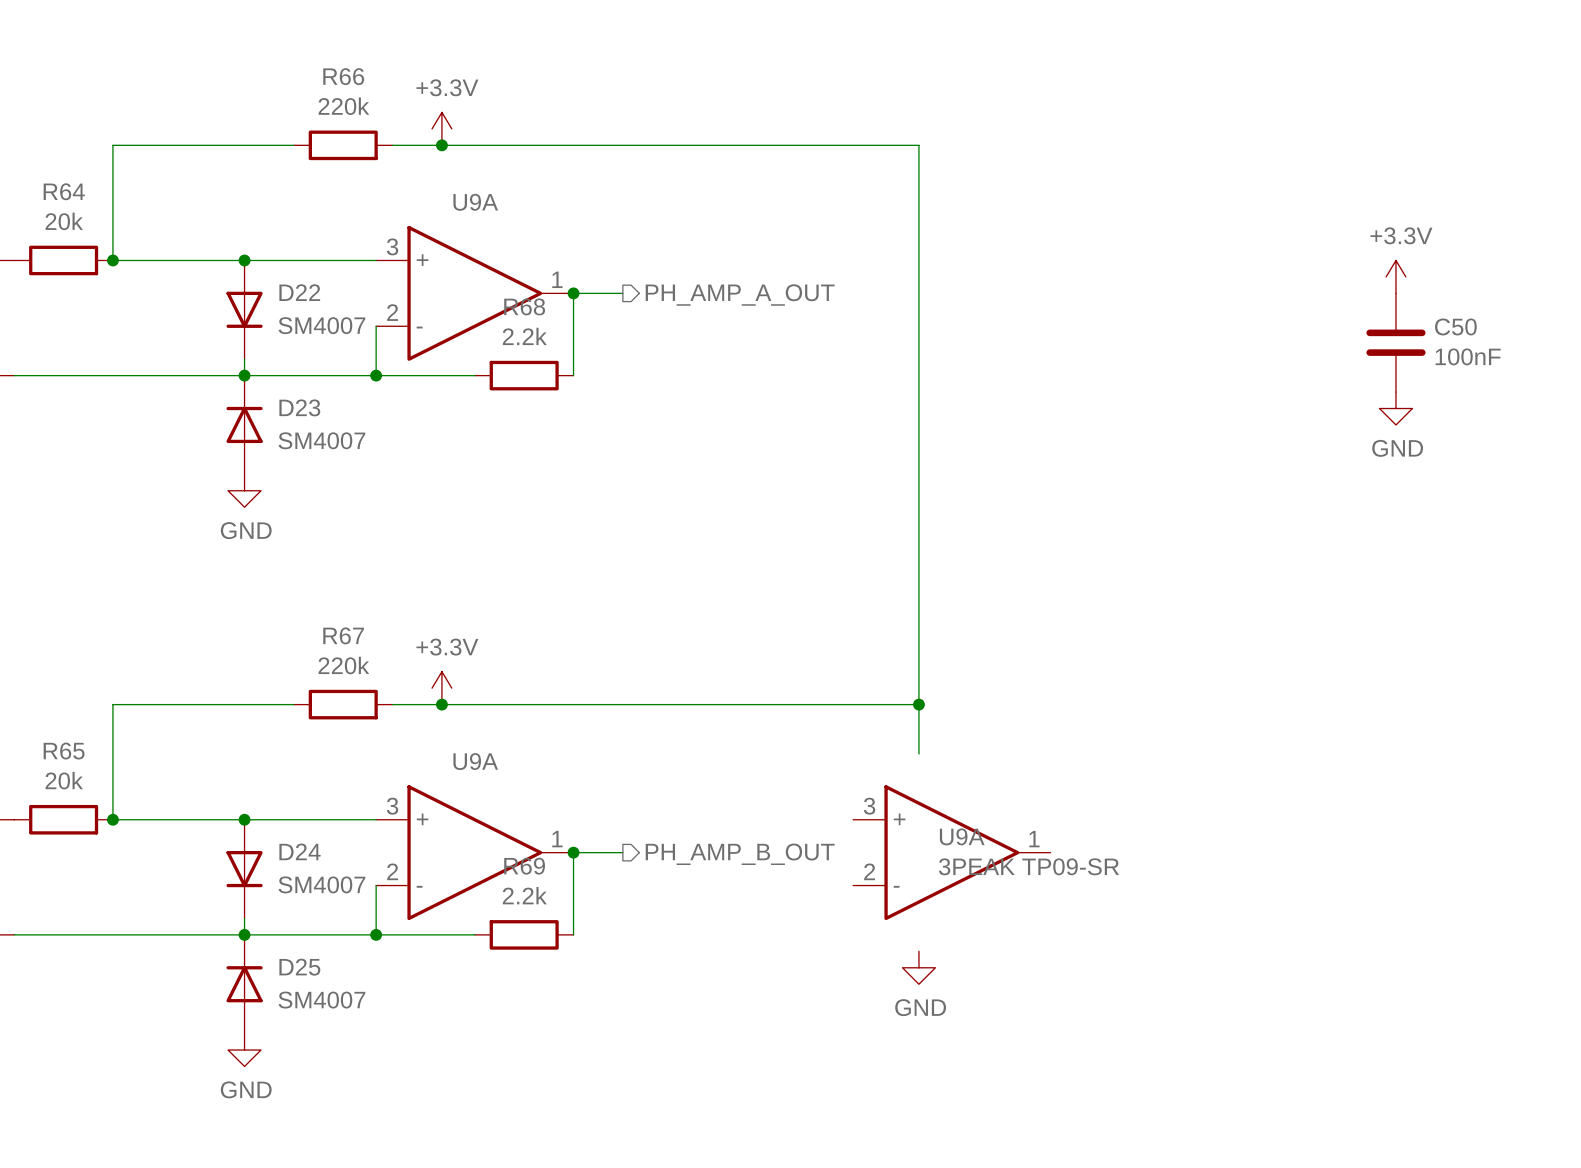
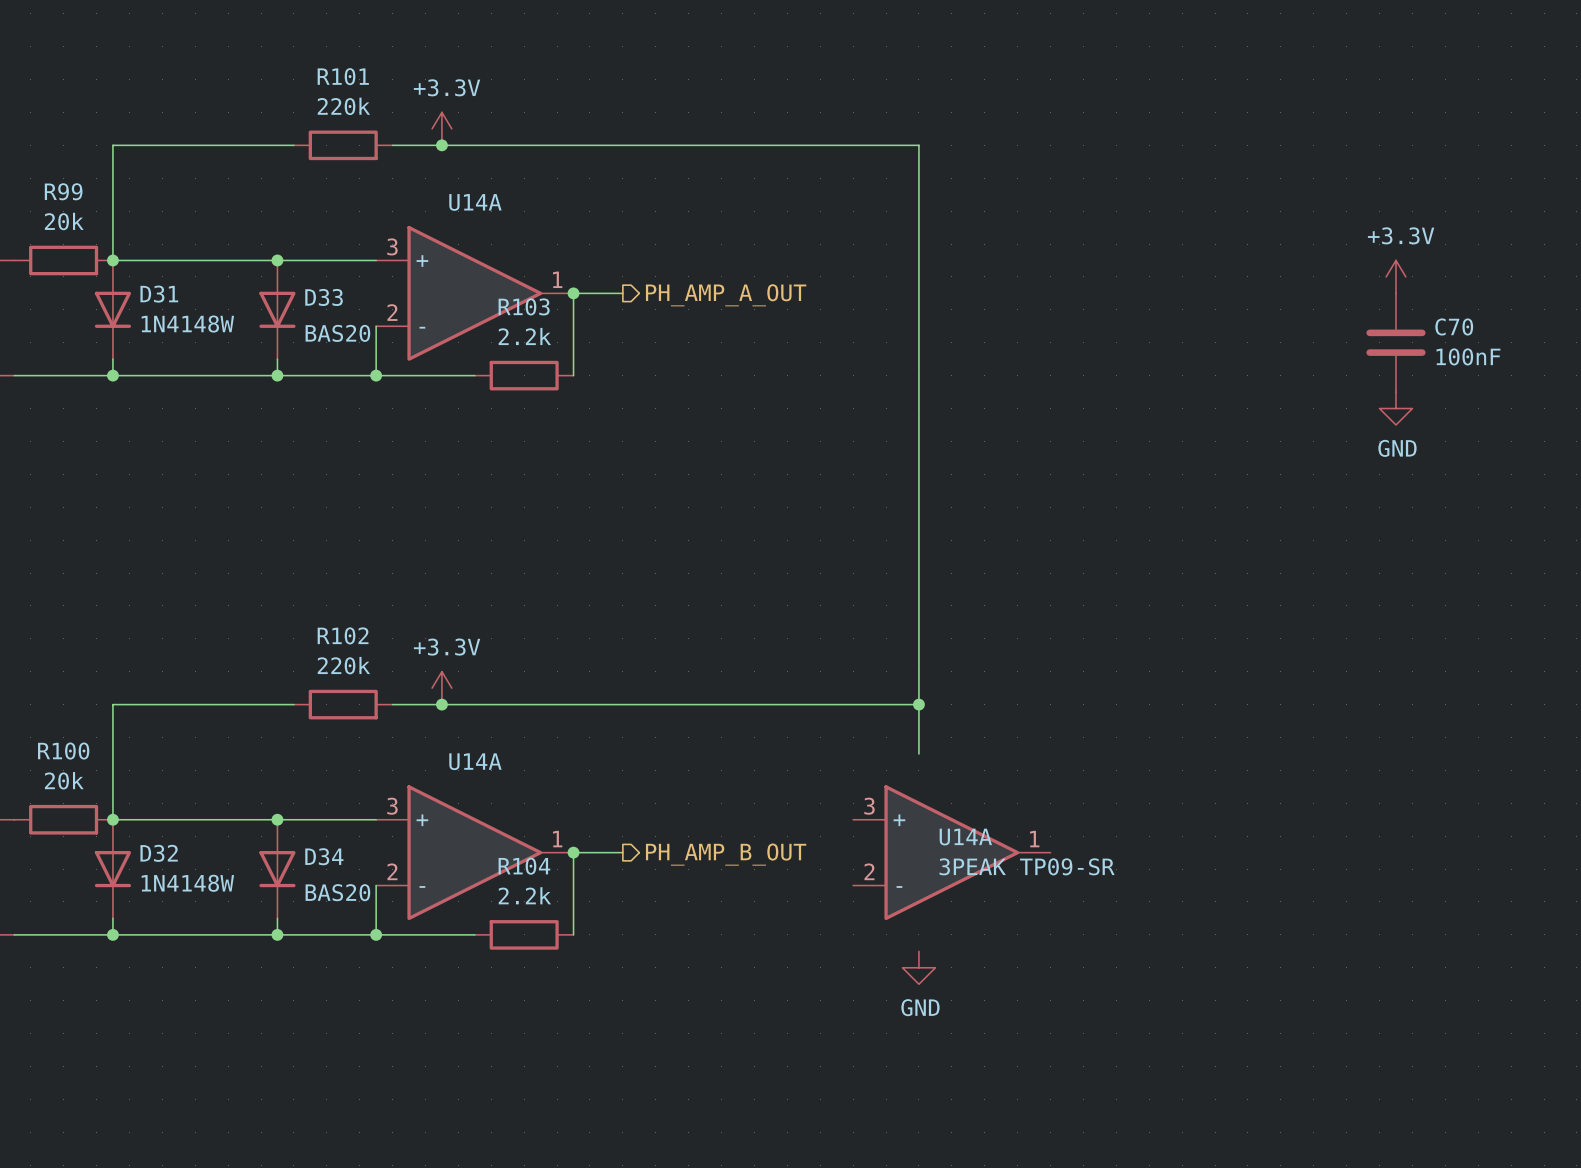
R66 name: R66 (343, 76) -> R101 (343, 76)
R64 name: R64 (64, 191) -> R99 (63, 191)
U9A name: U9A (475, 202) -> U14A (475, 202)
junction position: (244, 260) -> (277, 260)
R68 name: R68 (524, 306) -> R103 (524, 306)
D31: none -> 1N4148W (112, 309)
D22: SM4007 (244, 309) -> none
D33: none -> BAS20 (277, 309)
C50 name: C50 (1455, 326) -> C70 (1454, 326)
wire: none -> (112, 359) (112, 375)
wire: (244, 359) (244, 375) -> (277, 359) (277, 375)
junction: none -> (112, 375)
junction position: (244, 375) -> (277, 375)
D23: SM4007 (244, 424) -> none
power symbol: GND (244, 490) -> none
R67 name: R67 (343, 635) -> R102 (343, 635)
R65 name: R65 (64, 751) -> R100 (63, 751)
U9A name: U9A (475, 761) -> U14A (475, 761)
junction position: (244, 819) -> (277, 819)
U9A name: U9A (962, 836) -> U14A (965, 837)
R69 name: R69 (524, 866) -> R104 (524, 866)
D32: none -> 1N4148W (112, 869)
D24: SM4007 (244, 869) -> none
D34: none -> BAS20 (277, 869)
wire: none -> (112, 918) (112, 934)
wire: (244, 918) (244, 934) -> (277, 918) (277, 934)
junction: none -> (112, 934)
junction position: (244, 934) -> (277, 934)
D25: SM4007 (244, 984) -> none
power symbol: GND (244, 1050) -> none

